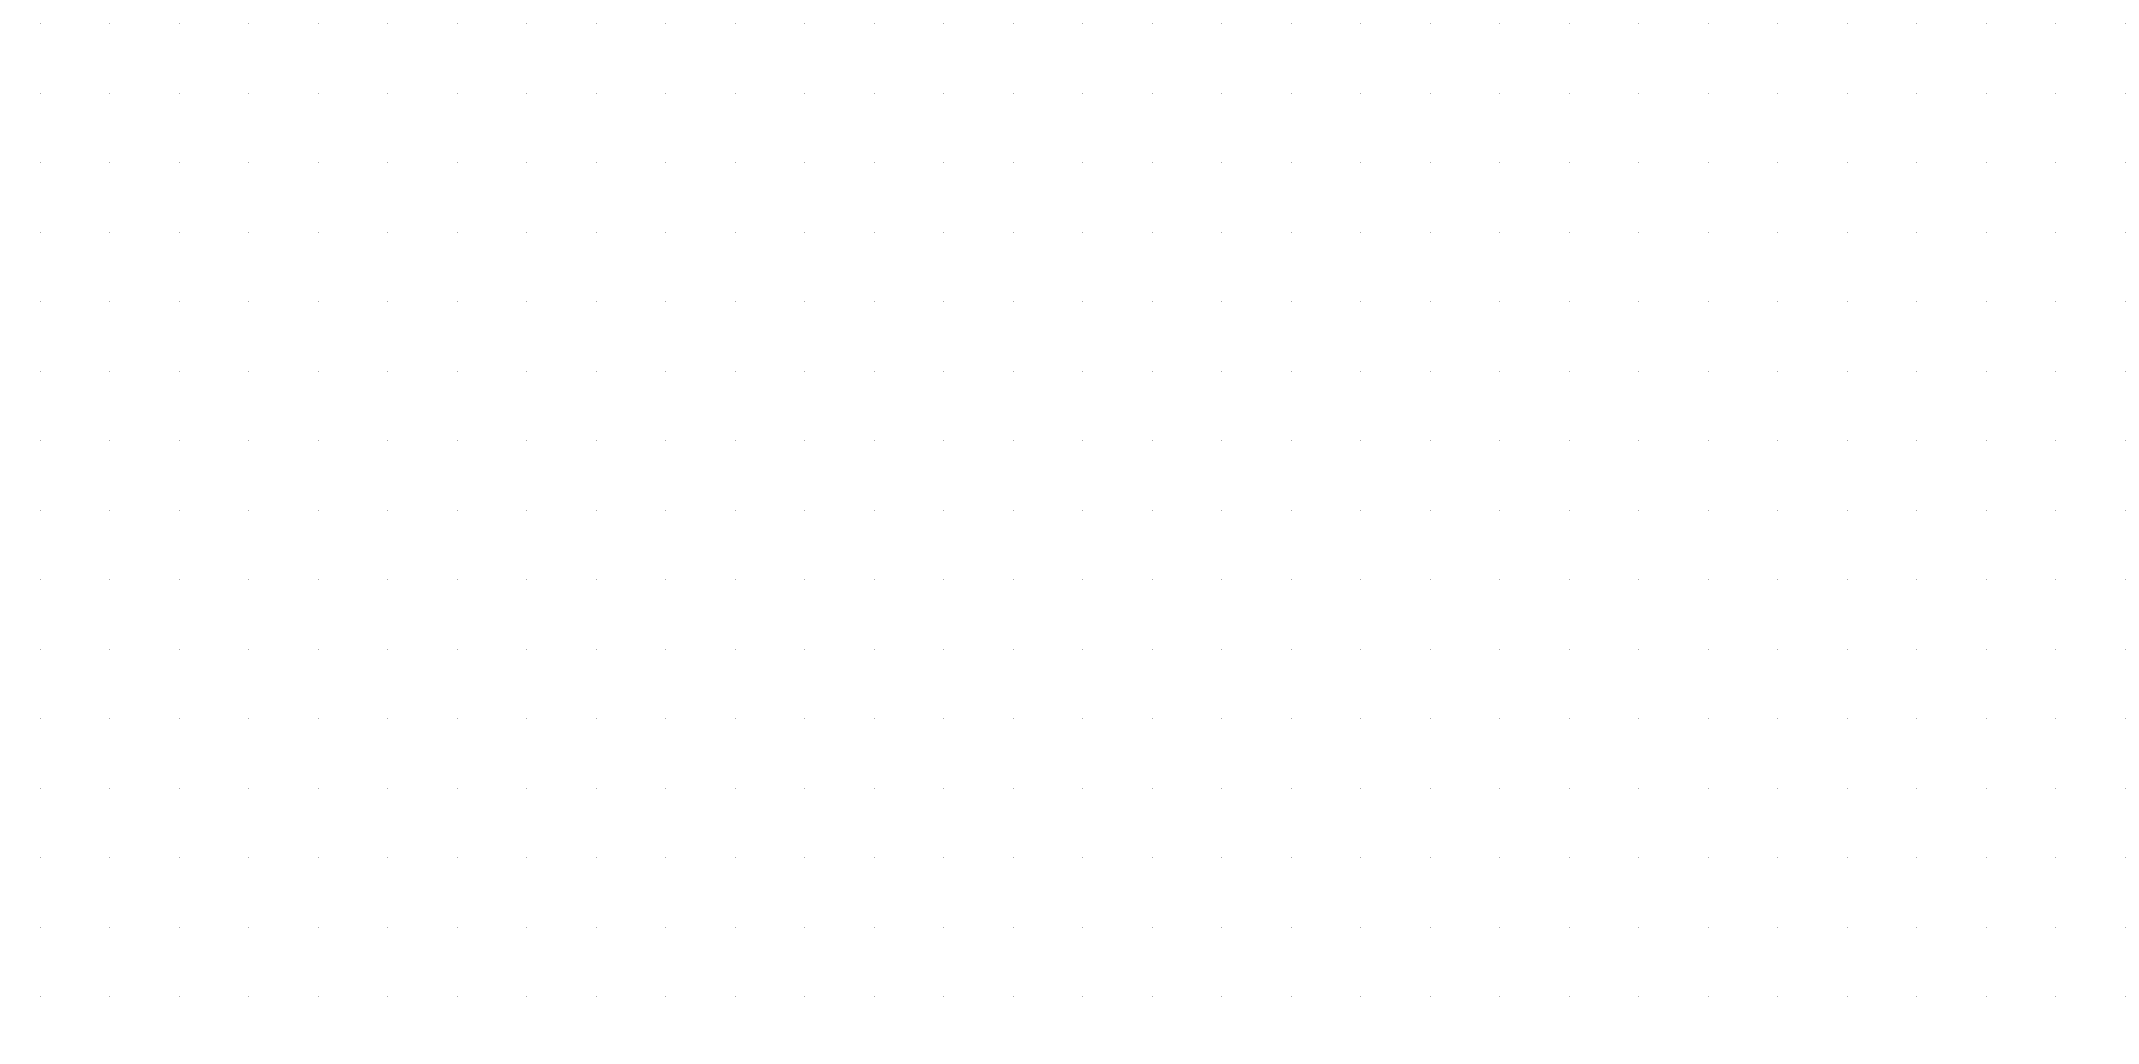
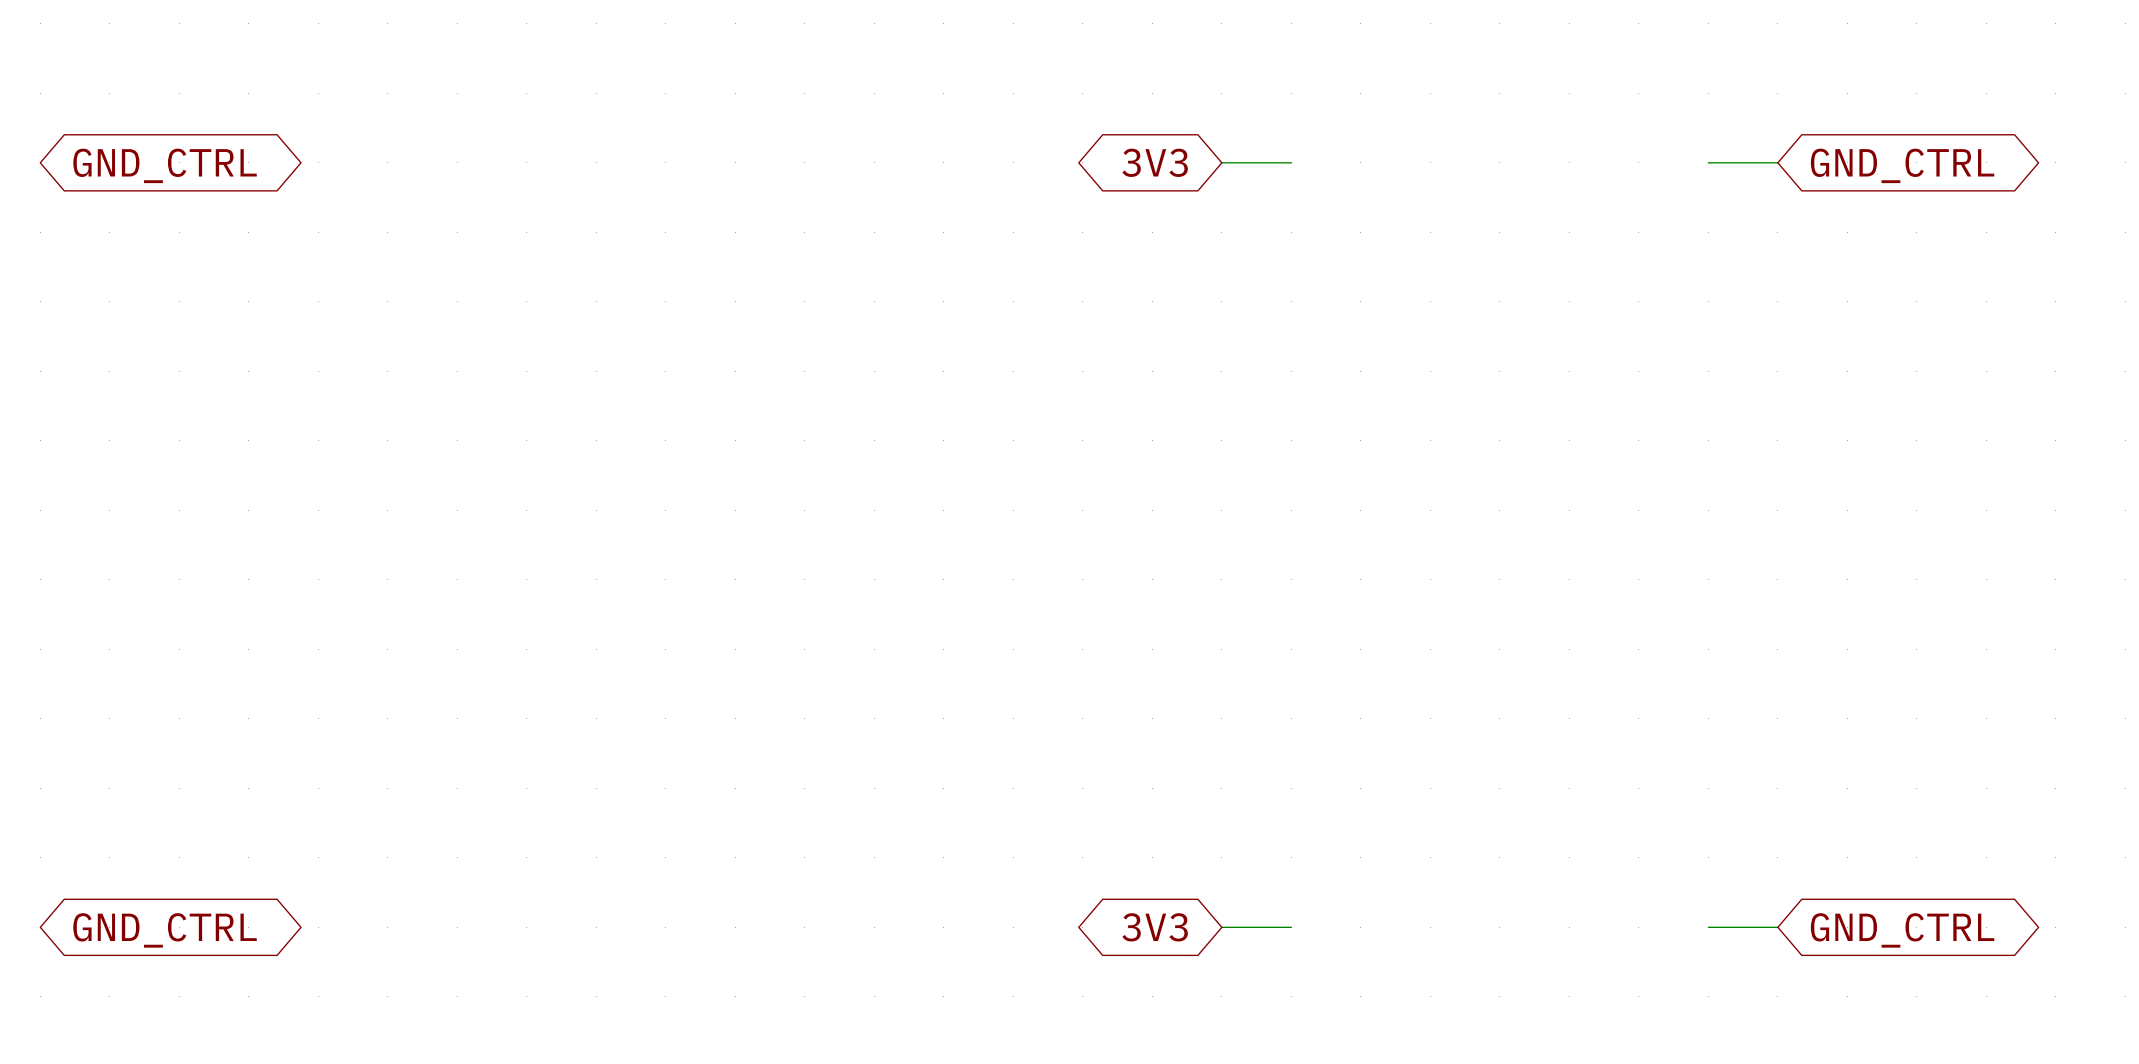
global label: none -> 3V3 (1155, 162)
wire: none -> (1221, 162) (1291, 162)
wire: none -> (1708, 162) (1777, 162)
global label: none -> GND_CTRL (165, 165)
global label: none -> GND_CTRL (1902, 165)
global label: none -> 3V3 (1155, 927)
wire: none -> (1221, 927) (1291, 927)
wire: none -> (1708, 927) (1777, 927)
global label: none -> GND_CTRL (165, 930)
global label: none -> GND_CTRL (1902, 930)

